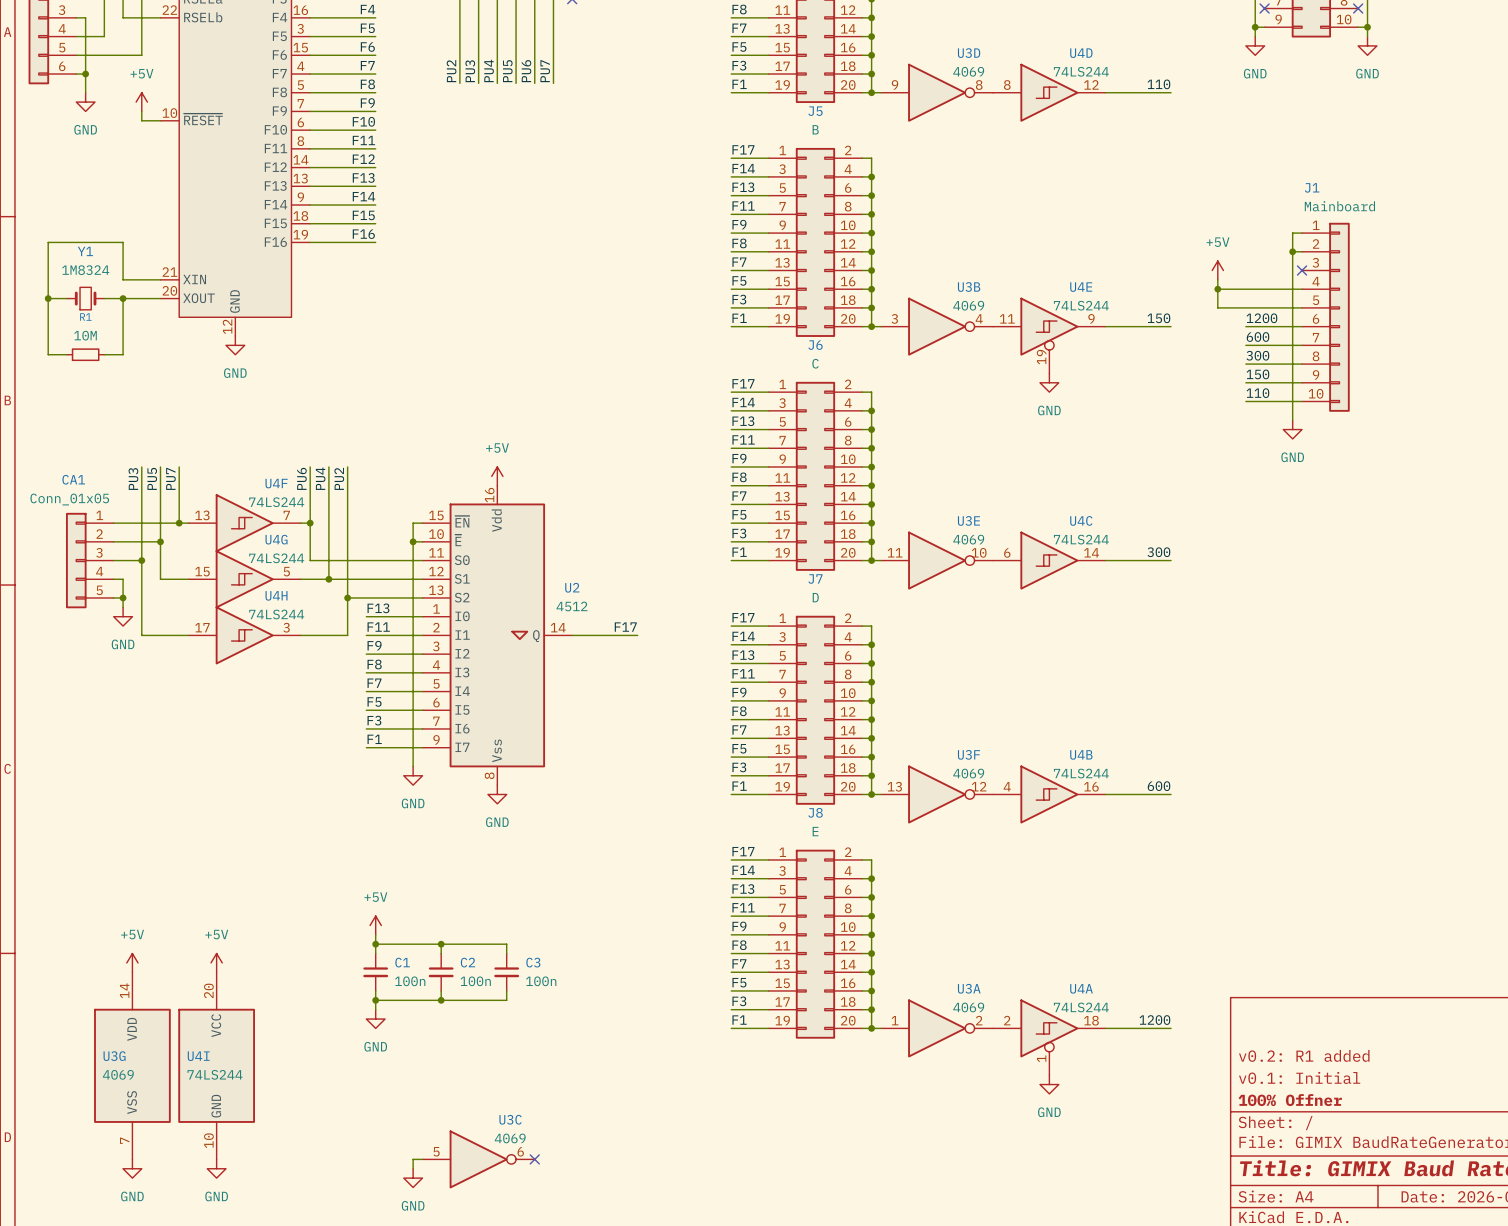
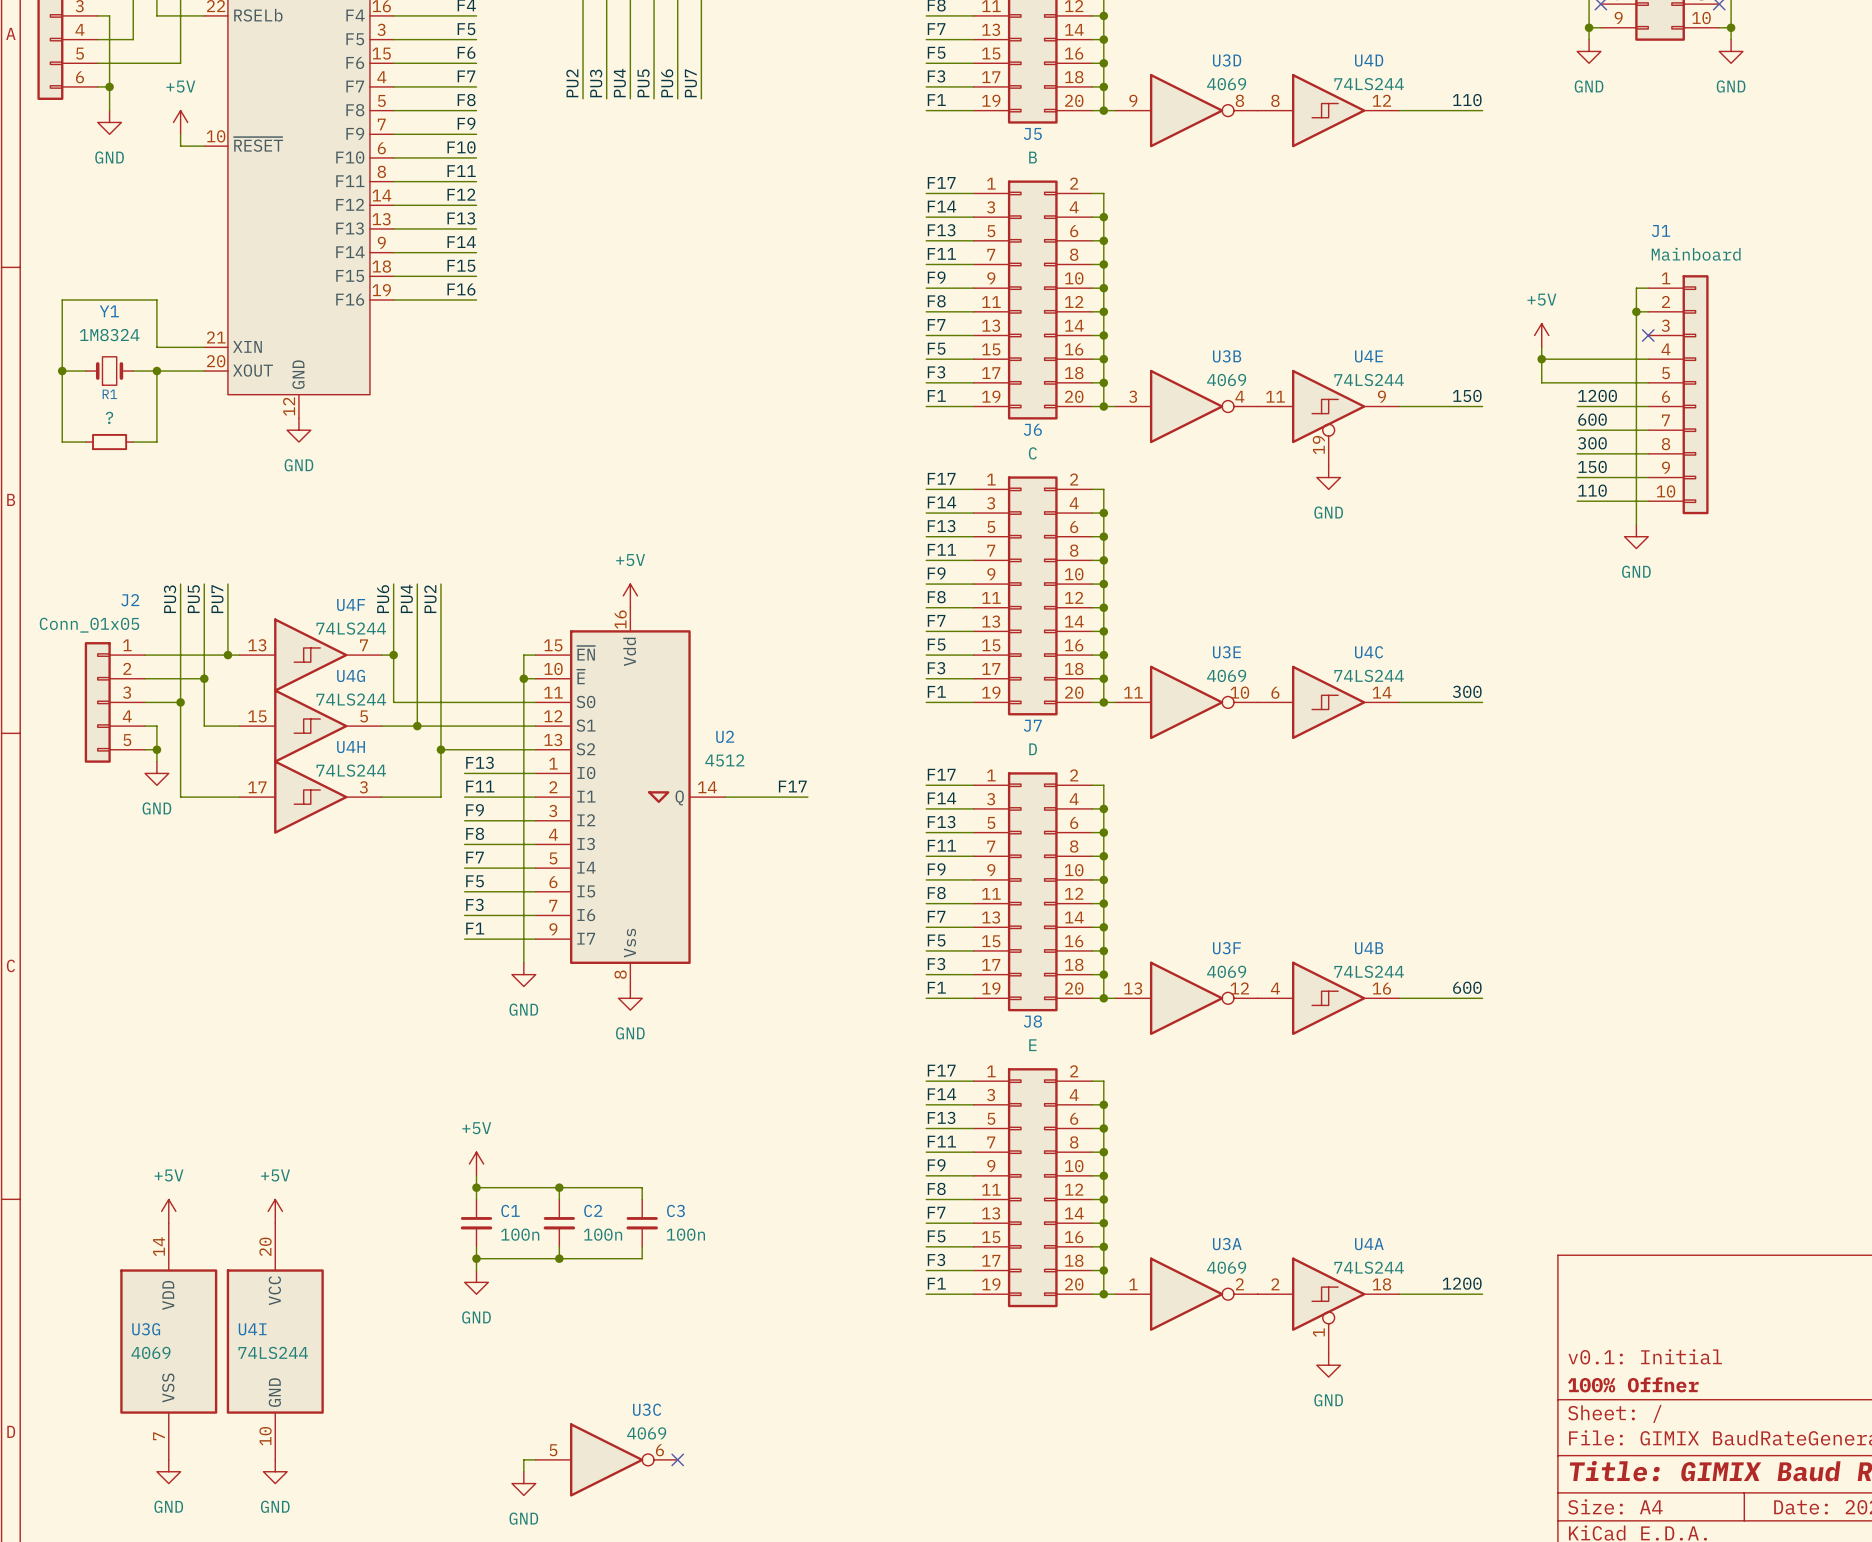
R1 value: 10M (85, 335) -> ? (109, 417)
CA1 name: CA1 (73, 479) -> J2 (130, 600)
title block: v0.2: R1 added (1304, 1055) -> none

